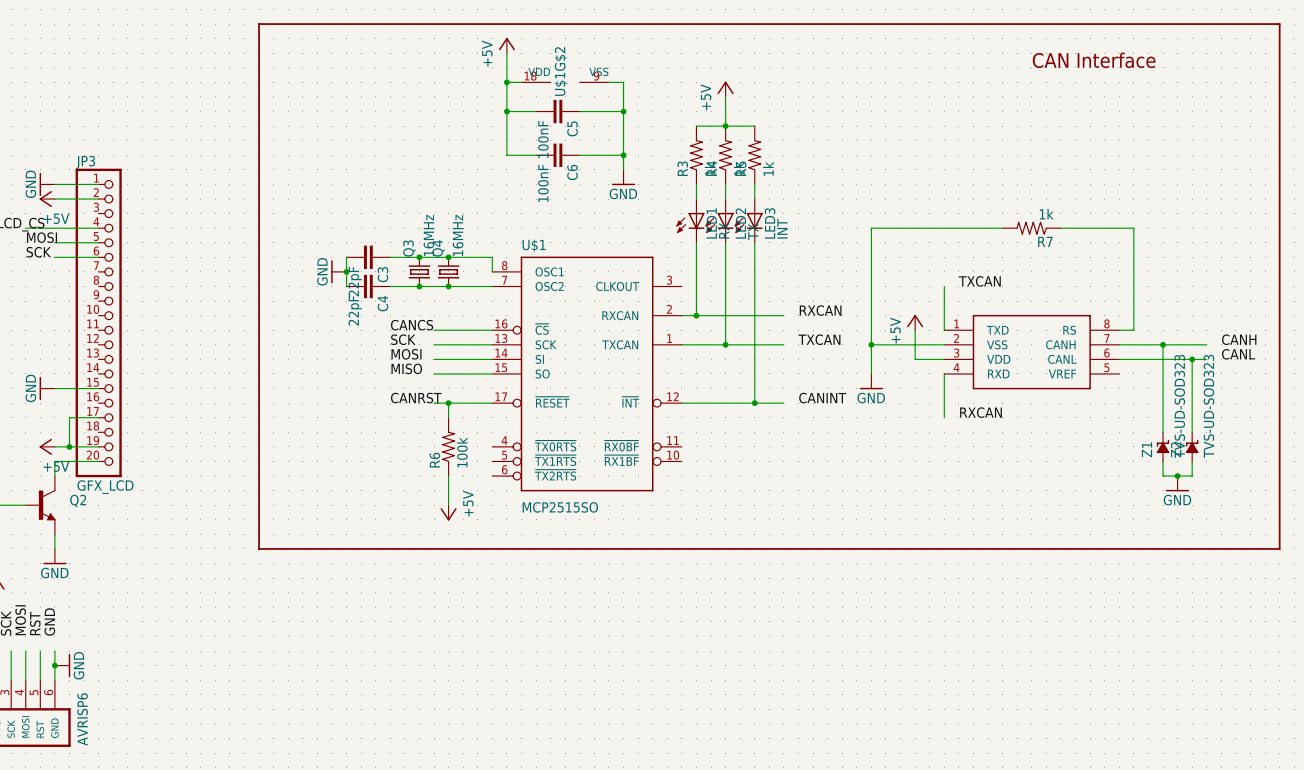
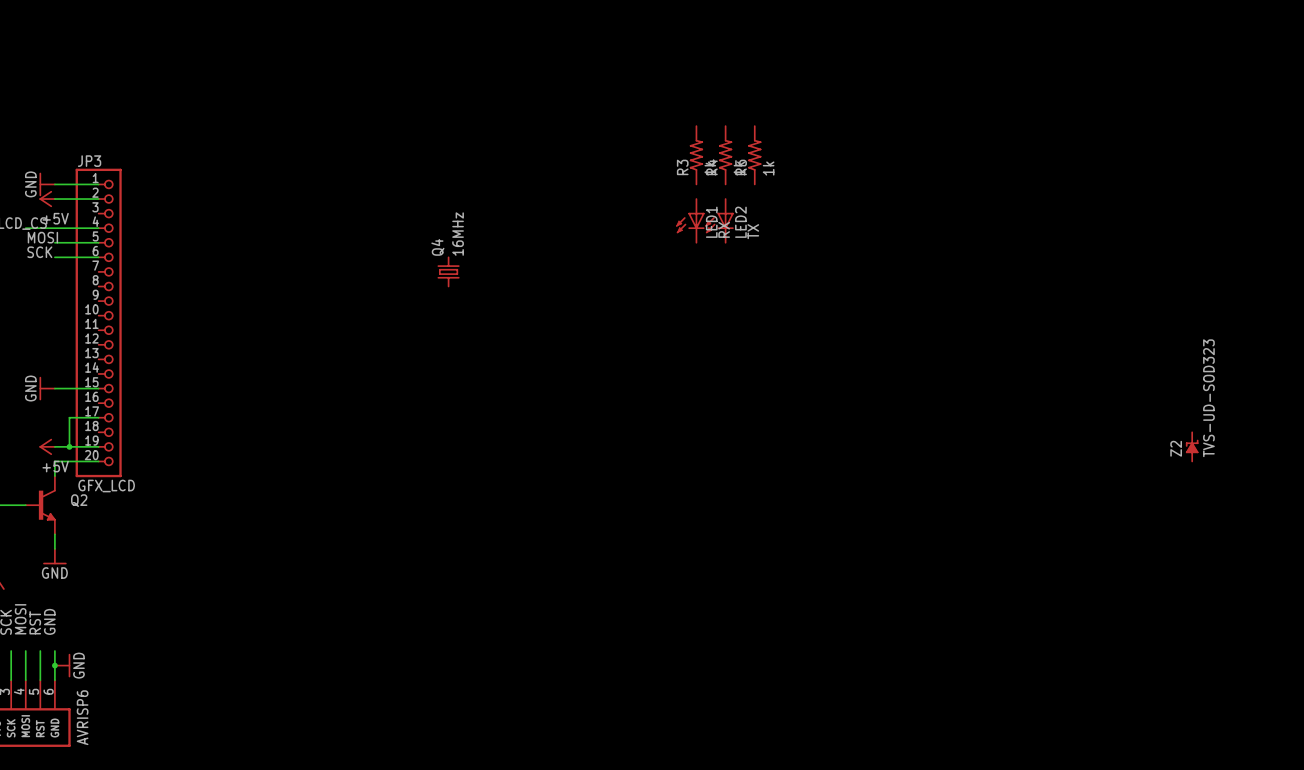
line: (259, 24) (259, 548) (1279, 548) (1279, 24) (259, 24) -> none
power symbol: +5V (506, 45) -> none
wire: (506, 53) (506, 155) (536, 155) -> none
text: CAN Interface (1094, 60) -> none
wire: (506, 82) (521, 82) -> none
junction: (506, 82) -> none
U$1G$2: (565, 82) -> none
wire: (608, 82) (623, 82) (623, 169) -> none
power symbol: +5V (725, 89) -> none
wire: (725, 96) (725, 126) -> none
wire: (506, 111) (536, 111) -> none
junction: (506, 111) -> none
C5: 100nF (557, 111) -> none
wire: (579, 111) (623, 111) -> none
junction: (623, 111) -> none
wire: (696, 126) (754, 126) -> none
junction: (725, 126) -> none
C6: 100nF (557, 155) -> none
wire: (579, 155) (623, 155) -> none
junction: (623, 155) -> none
power symbol: GND (623, 177) -> none
wire: (696, 184) (696, 199) -> none
wire: (725, 184) (725, 199) -> none
wire: (754, 184) (754, 199) -> none
LED3: INT (748, 220) -> none
wire: (1002, 228) (871, 228) (871, 373) -> none
R7: 1k (1031, 228) -> none
wire: (1060, 228) (1133, 228) (1133, 330) (1119, 330) -> none
wire: (696, 242) (696, 315) -> none
wire: (725, 242) (725, 344) -> none
wire: (754, 242) (754, 403) -> none
wire: (346, 257) (346, 286) -> none
C3: 22pF (368, 257) -> none
wire: (390, 257) (492, 257) (492, 271) -> none
junction: (419, 257) -> none
junction: (448, 257) -> none
power symbol: GND (338, 271) -> none
junction: (346, 271) -> none
Q3: 16MHz (419, 271) -> none
label: TXCAN (979, 281) -> none
C4: 22pF (368, 286) -> none
wire: (390, 286) (492, 286) -> none
junction: (419, 286) -> none
junction: (448, 286) -> none
wire: (944, 286) (944, 330) -> none
label: RXCAN (820, 310) -> none
wire: (681, 315) (783, 315) -> none
junction: (696, 315) -> none
power symbol: +5V (915, 322) -> none
label: CANCS (412, 325) -> none
wire: (434, 330) (492, 330) -> none
wire: (915, 330) (915, 359) (944, 359) -> none
label: SCK (403, 339) -> none
label: TXCAN (819, 339) -> none
label: CANH (1239, 339) -> none
wire: (434, 344) (492, 344) -> none
wire: (681, 344) (783, 344) -> none
junction: (725, 344) -> none
wire: (871, 344) (944, 344) -> none
junction: (871, 344) -> none
wire: (1119, 344) (1206, 344) -> none
wire: (1163, 344) (1163, 432) -> none
junction: (1163, 344) -> none
part: (1031, 352) -> none
label: MOSI (406, 354) -> none
label: CANL (1238, 354) -> none
wire: (434, 359) (492, 359) -> none
wire: (1119, 359) (1206, 359) -> none
wire: (1192, 359) (1192, 432) -> none
junction: (1192, 359) -> none
label: MISO (406, 368) -> none
wire: (434, 373) (492, 373) -> none
U$1: MCP2515SO (587, 373) -> none
wire: (944, 373) (944, 417) -> none
power symbol: GND (871, 381) -> none
label: CANRST (416, 398) -> none
label: CANINT (822, 398) -> none
wire: (434, 403) (492, 403) -> none
wire: (448, 403) (448, 417) -> none
junction: (448, 403) -> none
wire: (681, 403) (783, 403) -> none
junction: (754, 403) -> none
label: RXCAN (981, 412) -> none
R6: 100k (448, 446) -> none
Z1: TVS-UD-SOD323 (1163, 446) -> none
wire: (1163, 461) (1163, 476) (1192, 476) (1192, 461) -> none
wire: (448, 476) (448, 505) -> none
junction: (1177, 476) -> none
power symbol: GND (1177, 483) -> none
power symbol: +5V (448, 512) -> none

